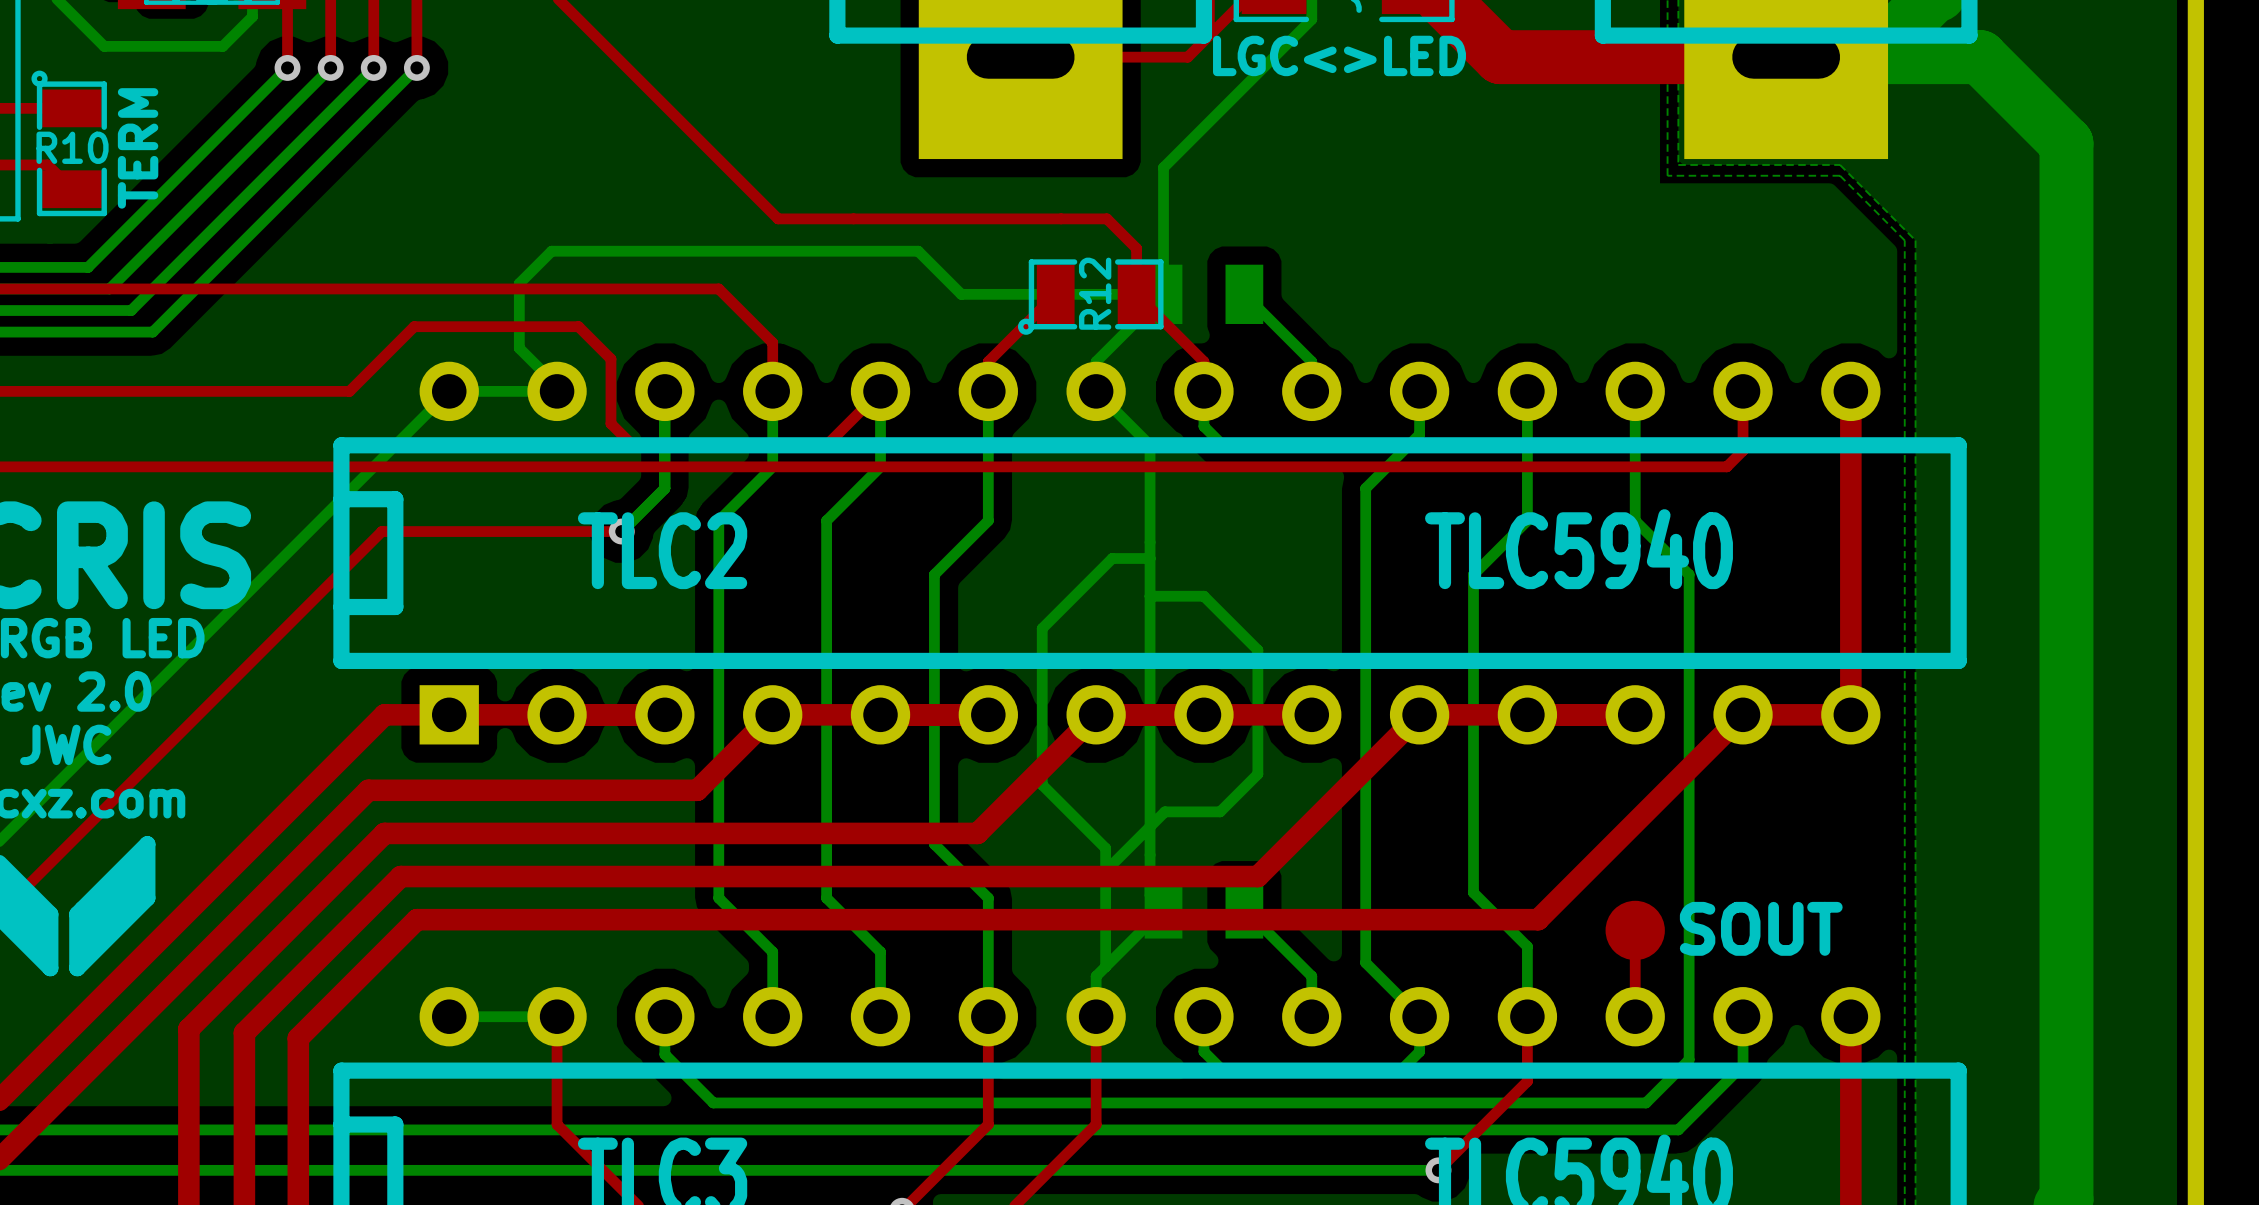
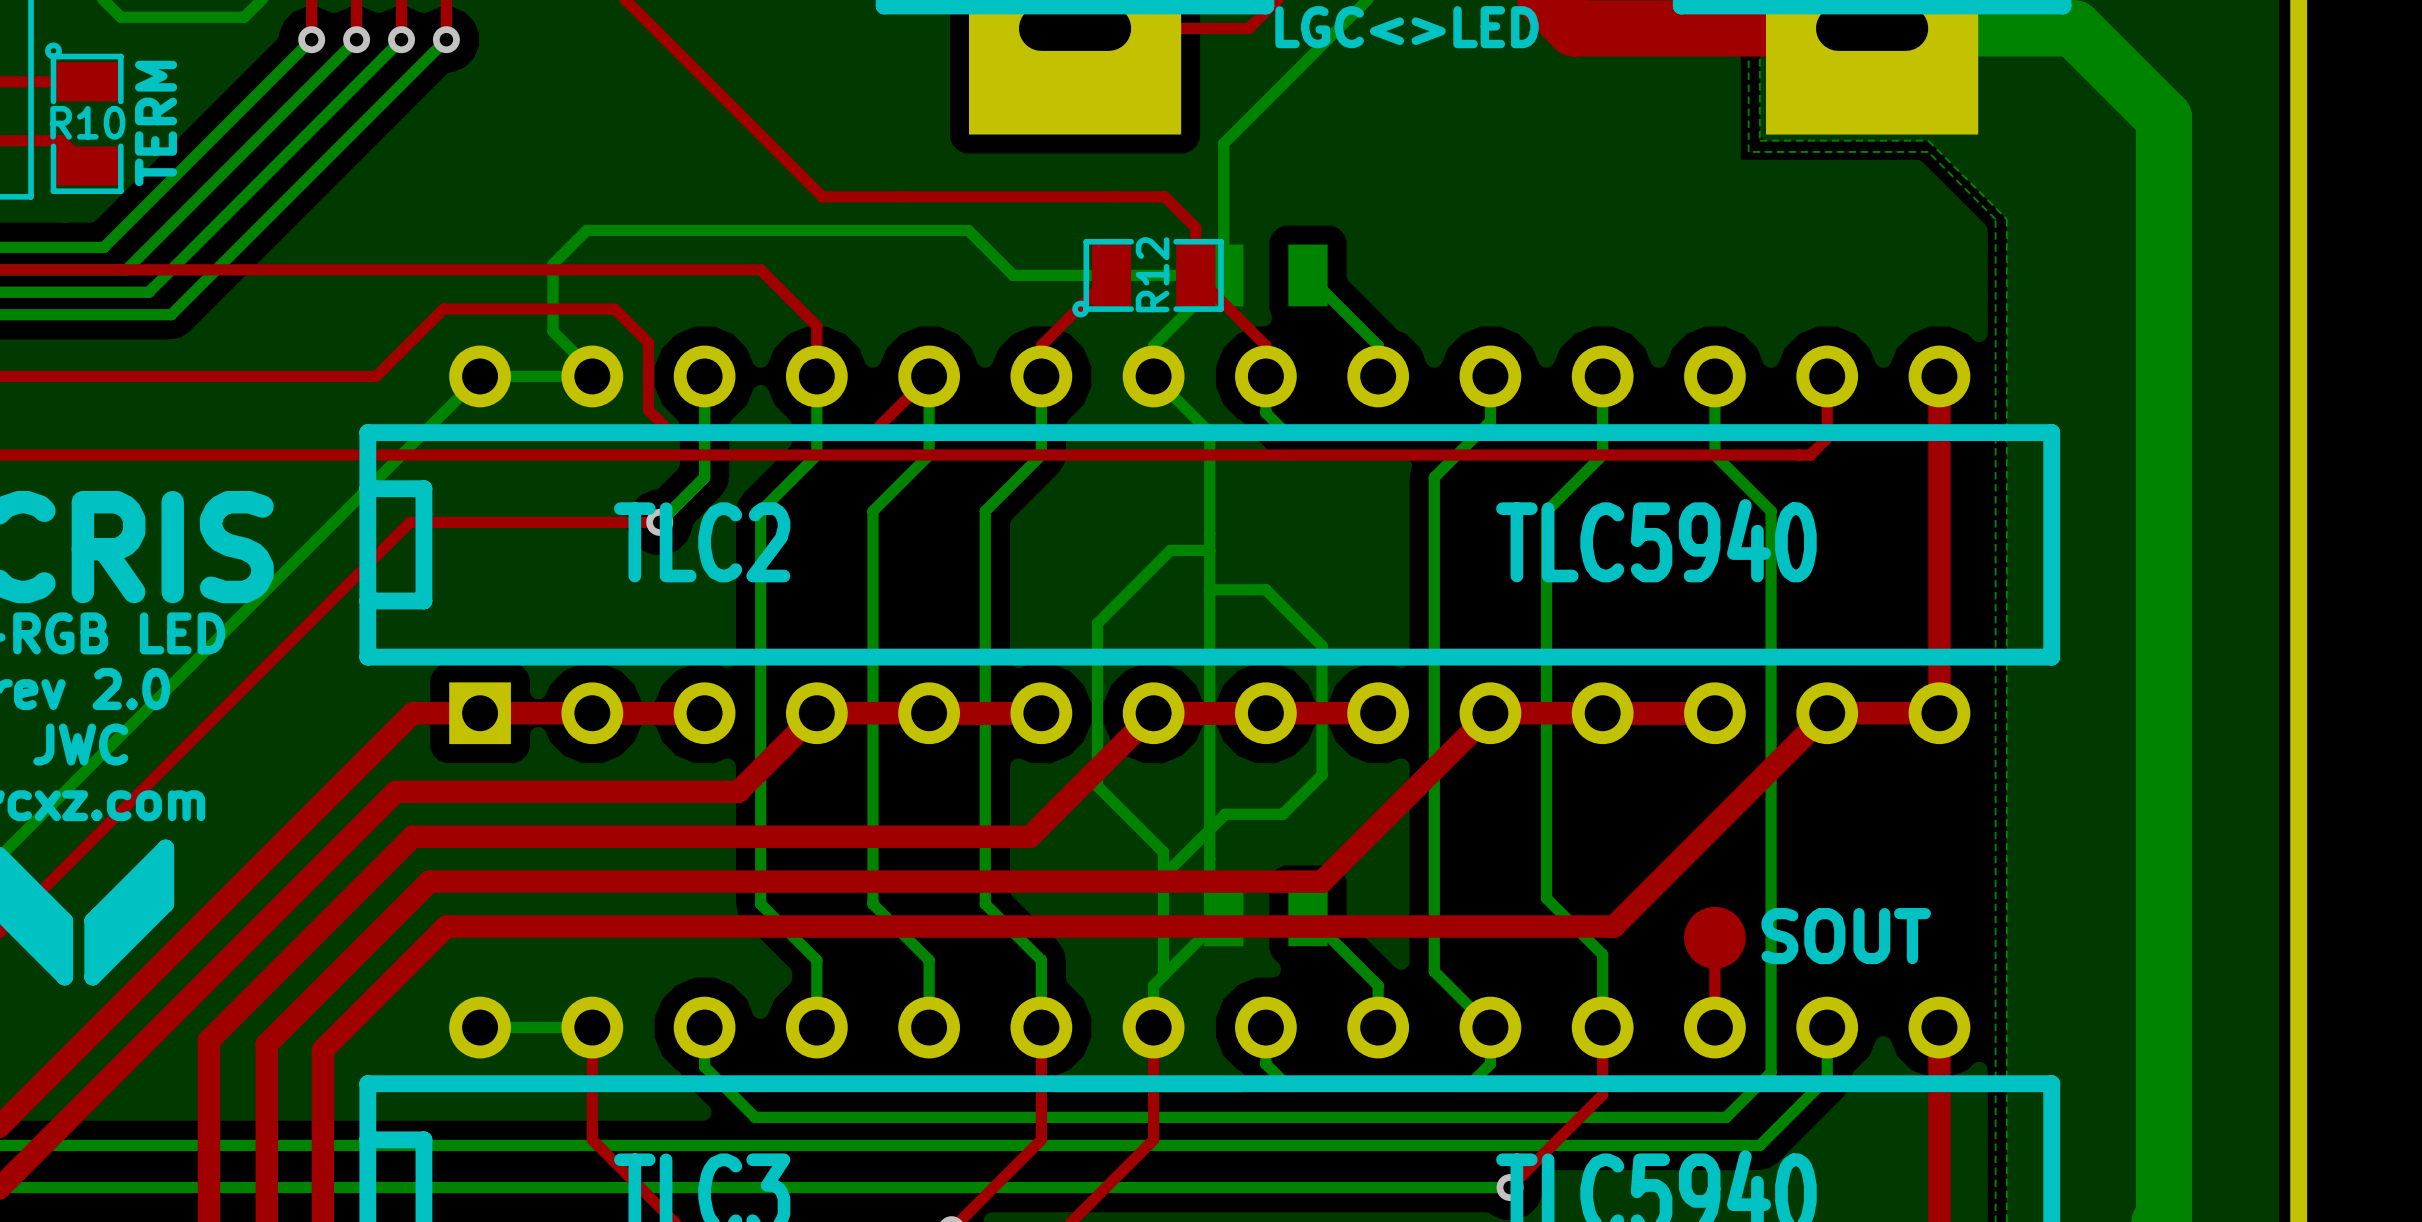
bottom track: (988, 466) (988, 520) (934, 574) -> (1041, 455) (985, 511) (985, 567)
bottom track: (1527, 466) (1527, 520) (1473, 574) -> (1602, 455) (1546, 511) (1546, 567)
bottom track: (1635, 466) (1635, 520) (1689, 574) -> (1714, 455) (1771, 511) (1771, 567)
bottom track: (934, 844) (988, 898) (988, 952) -> (985, 847) (985, 904) (1041, 960)

